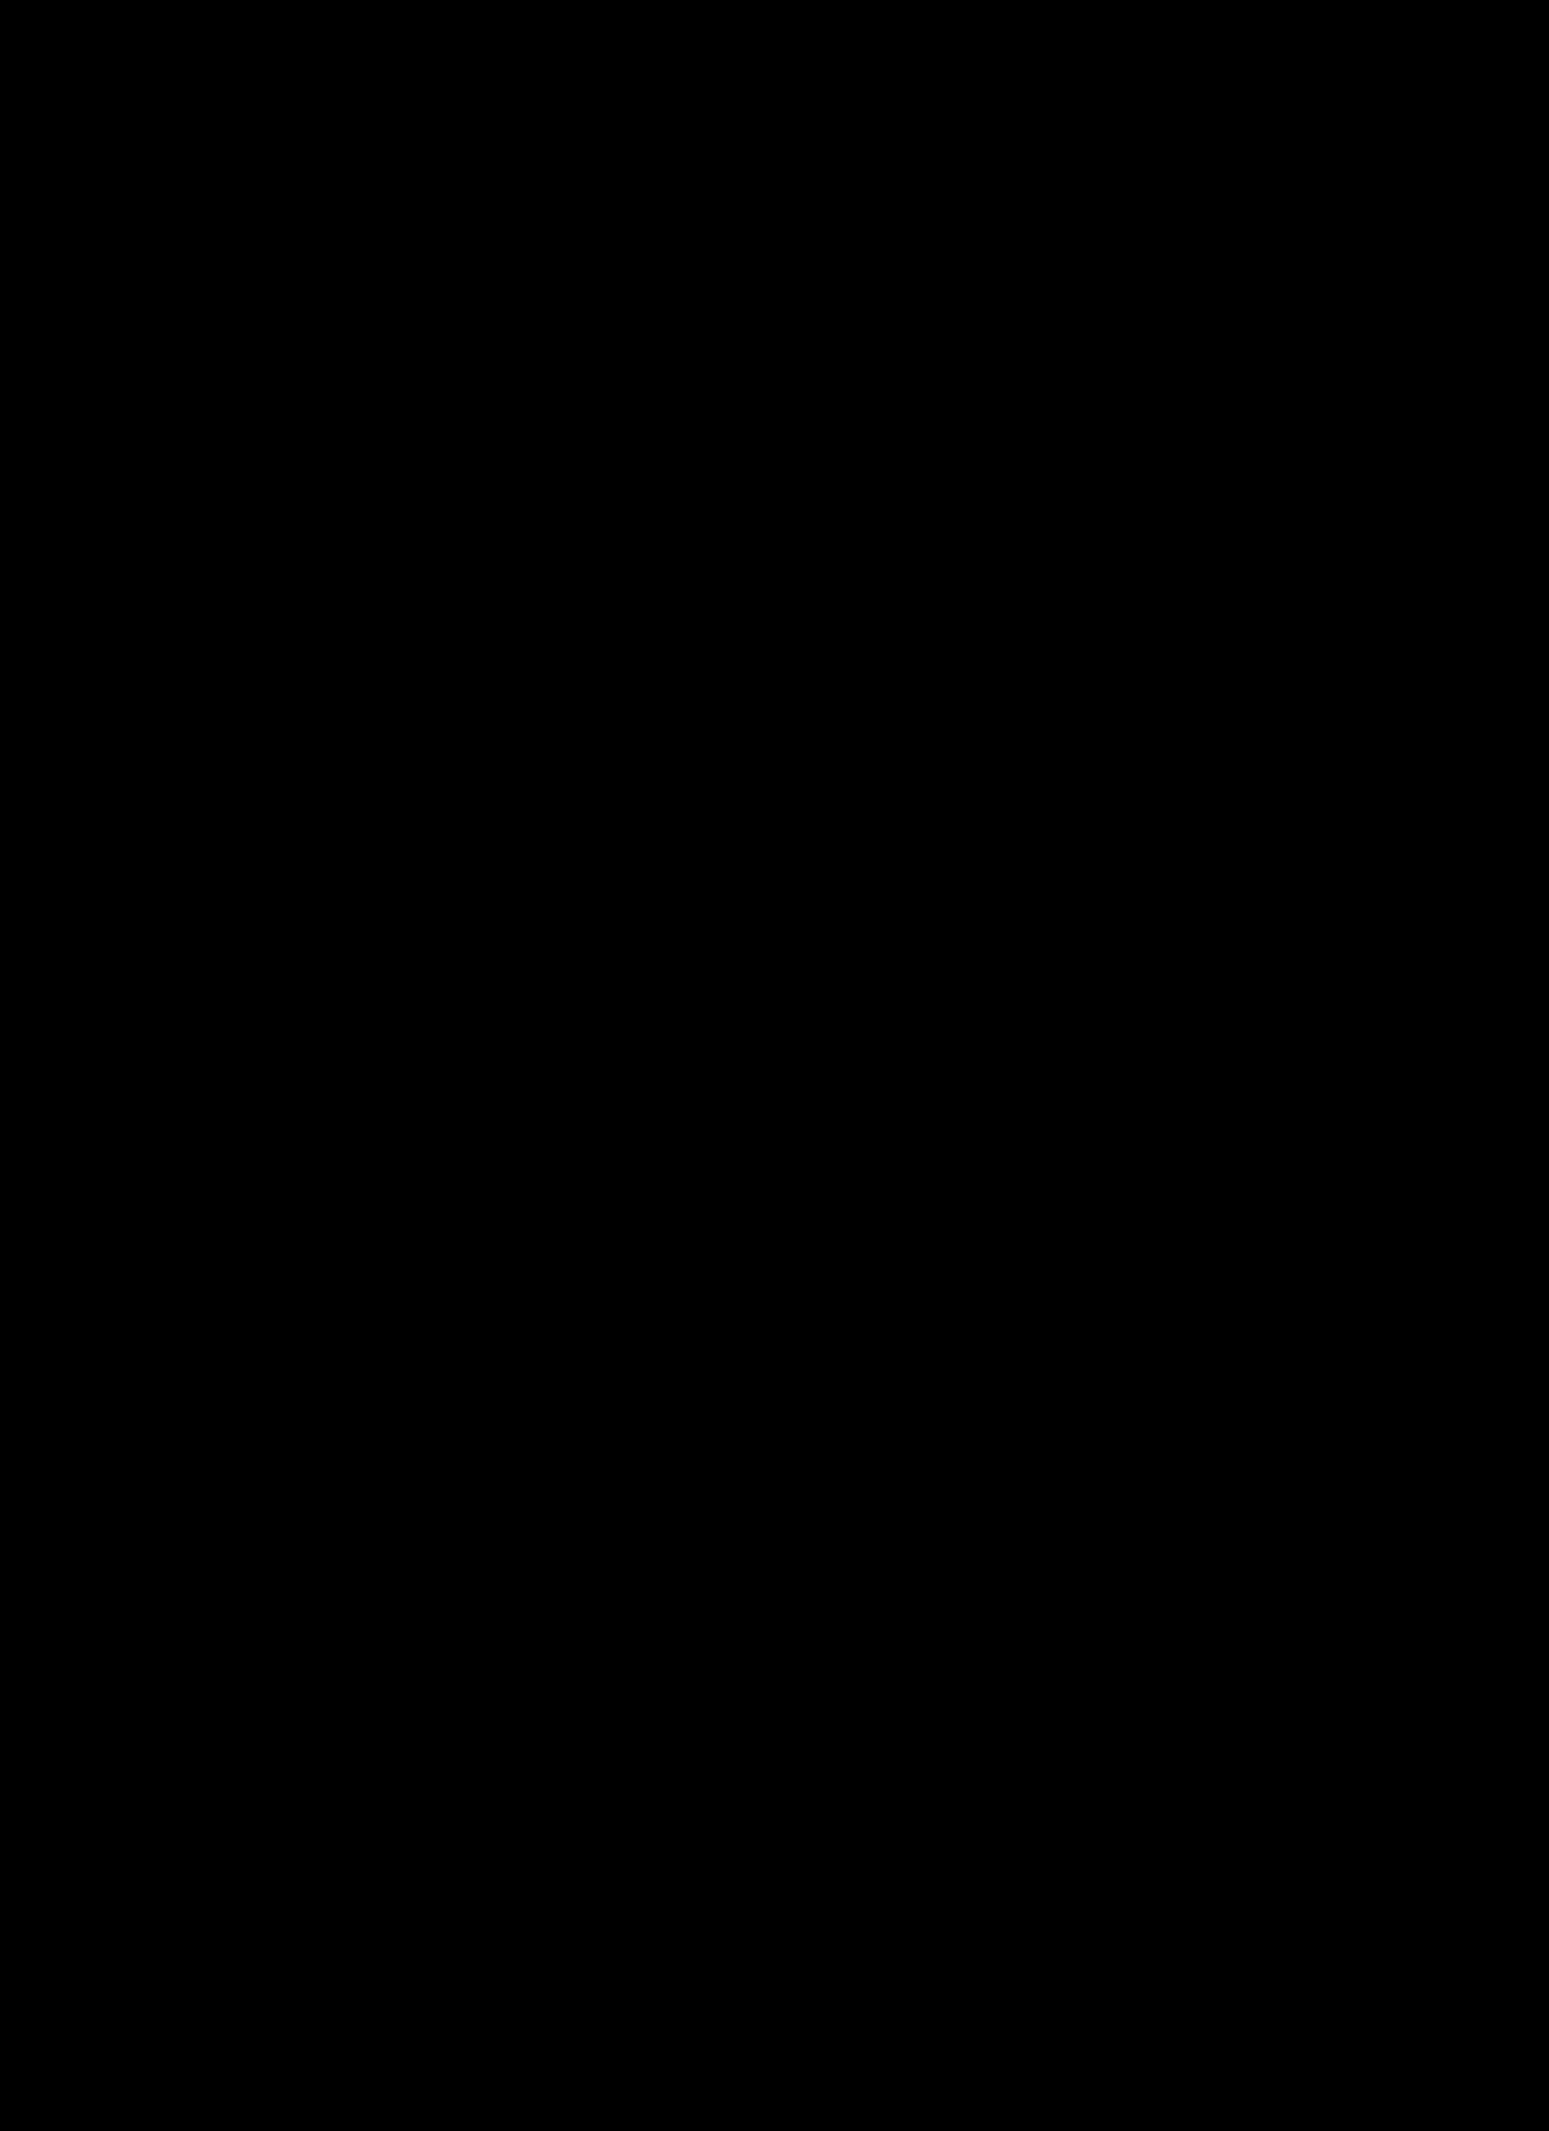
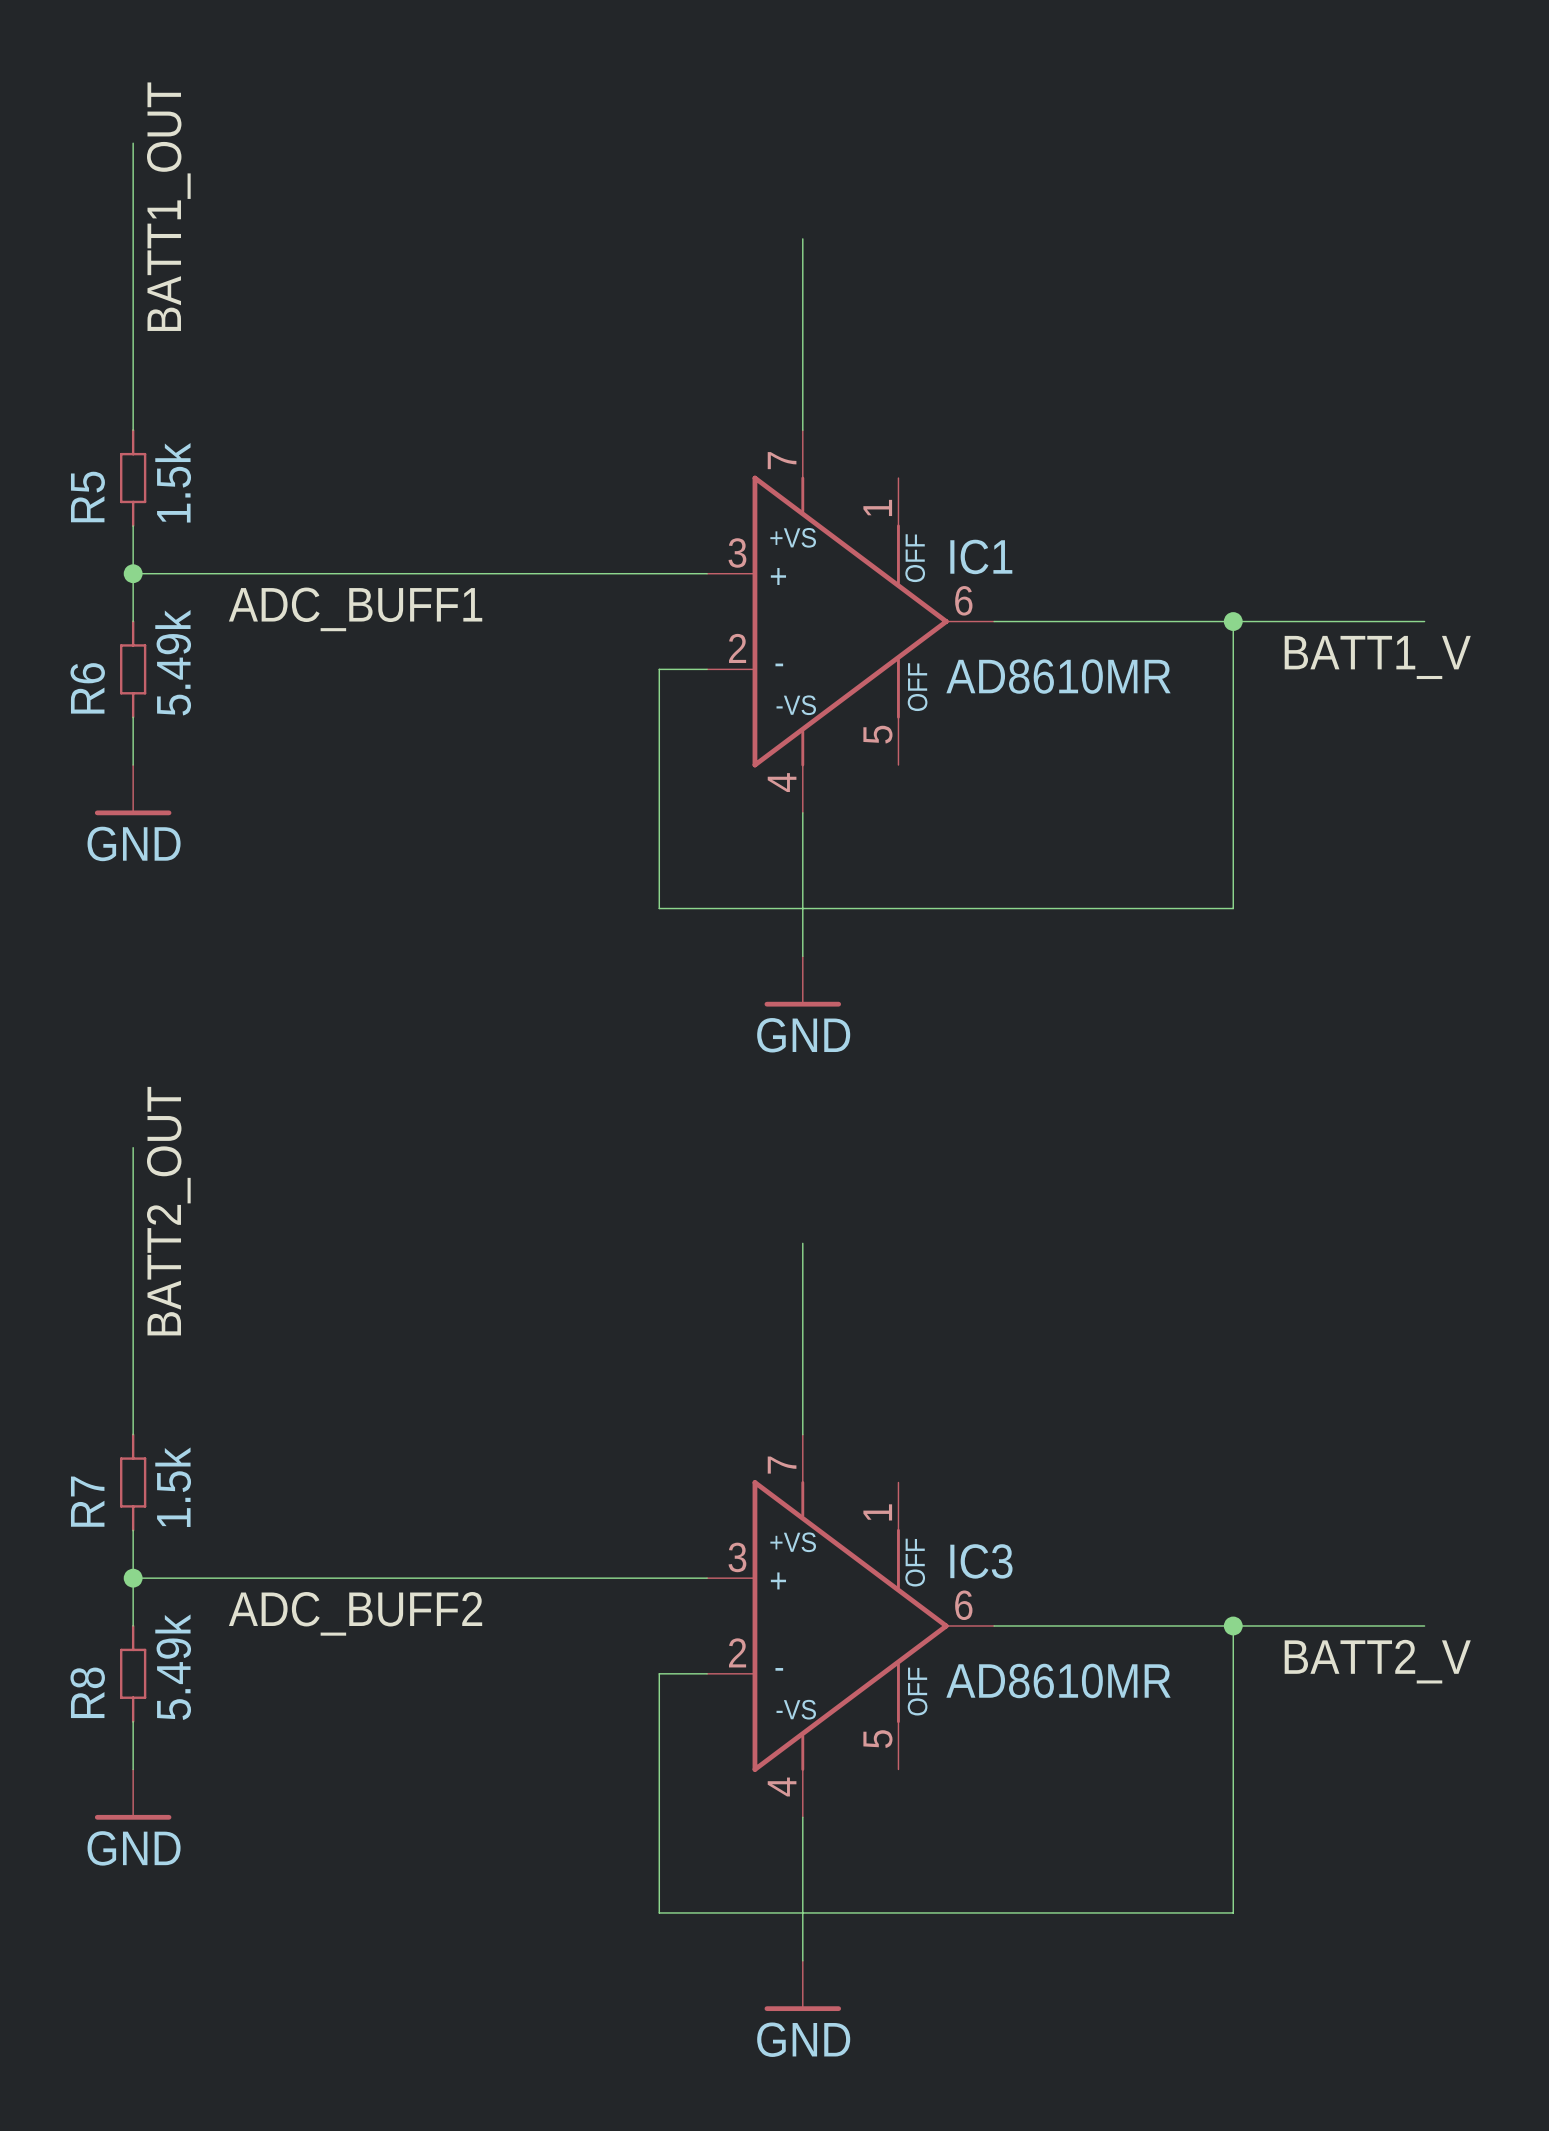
wire: none -> (133, 143) (133, 430)
label: none -> BATT1_OUT (168, 206)
wire: none -> (802, 238) (802, 430)
R5: none -> 1.5k (133, 478)
wire: none -> (133, 525) (133, 621)
wire: none -> (133, 573) (707, 573)
junction: none -> (133, 573)
label: none -> ADC_BUFF1 (355, 609)
IC1: none -> AD8610MR (850, 621)
wire: none -> (994, 621) (1424, 621)
wire: none -> (1233, 621) (1233, 908) (659, 908) (659, 669) (707, 669)
junction: none -> (1233, 621)
label: none -> BATT1_V (1377, 657)
R6: none -> 5.49k (133, 669)
wire: none -> (133, 717) (133, 765)
power symbol: none -> GND (133, 790)
wire: none -> (802, 812) (802, 956)
power symbol: none -> GND (802, 981)
wire: none -> (133, 1147) (133, 1434)
label: none -> BATT2_OUT (168, 1211)
wire: none -> (802, 1243) (802, 1434)
R7: none -> 1.5k (133, 1482)
wire: none -> (133, 1530) (133, 1625)
wire: none -> (133, 1578) (707, 1578)
junction: none -> (133, 1578)
label: none -> ADC_BUFF2 (355, 1613)
IC3: none -> AD8610MR (850, 1625)
wire: none -> (994, 1625) (1424, 1625)
wire: none -> (1233, 1625) (1233, 1912) (659, 1912) (659, 1673) (707, 1673)
junction: none -> (1233, 1625)
label: none -> BATT2_V (1377, 1661)
R8: none -> 5.49k (133, 1673)
wire: none -> (133, 1721) (133, 1769)
power symbol: none -> GND (133, 1794)
wire: none -> (802, 1817) (802, 1960)
power symbol: none -> GND (802, 1985)

